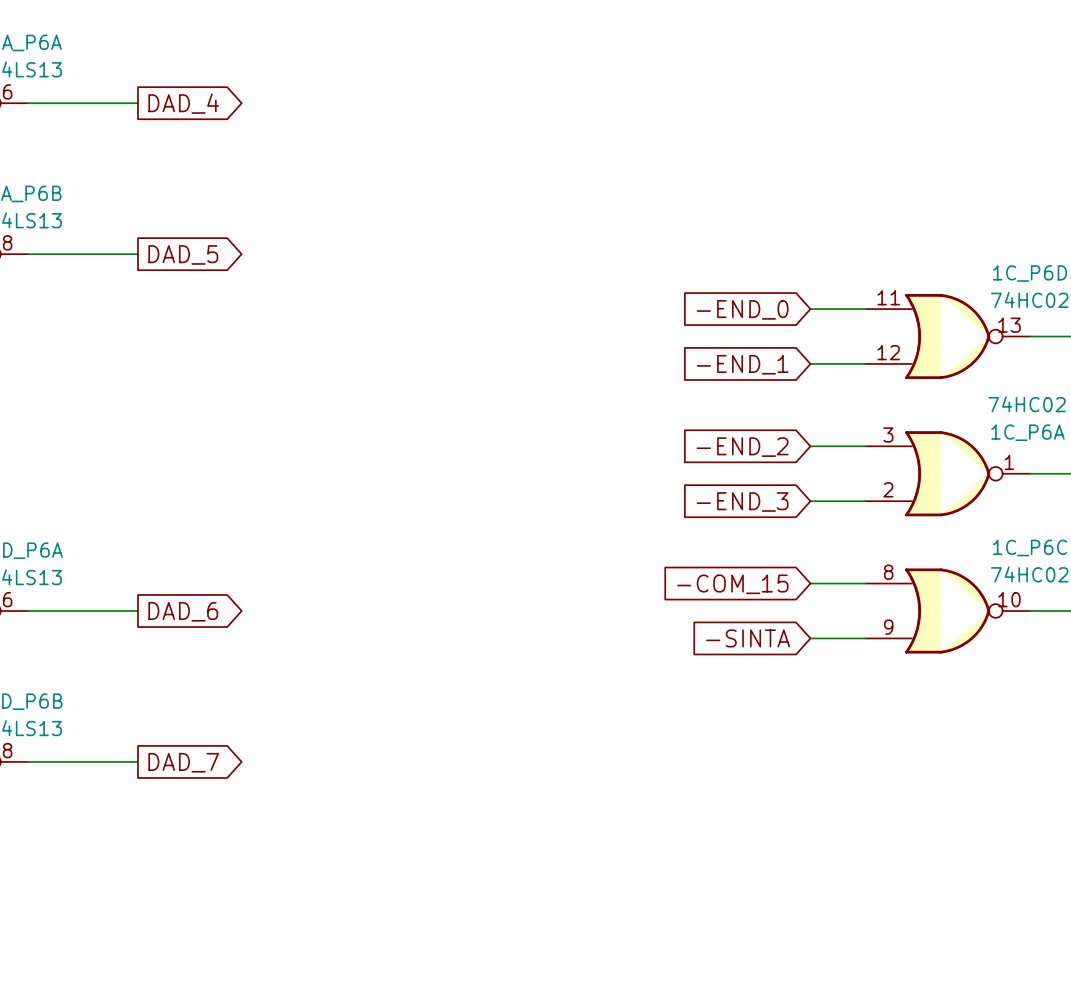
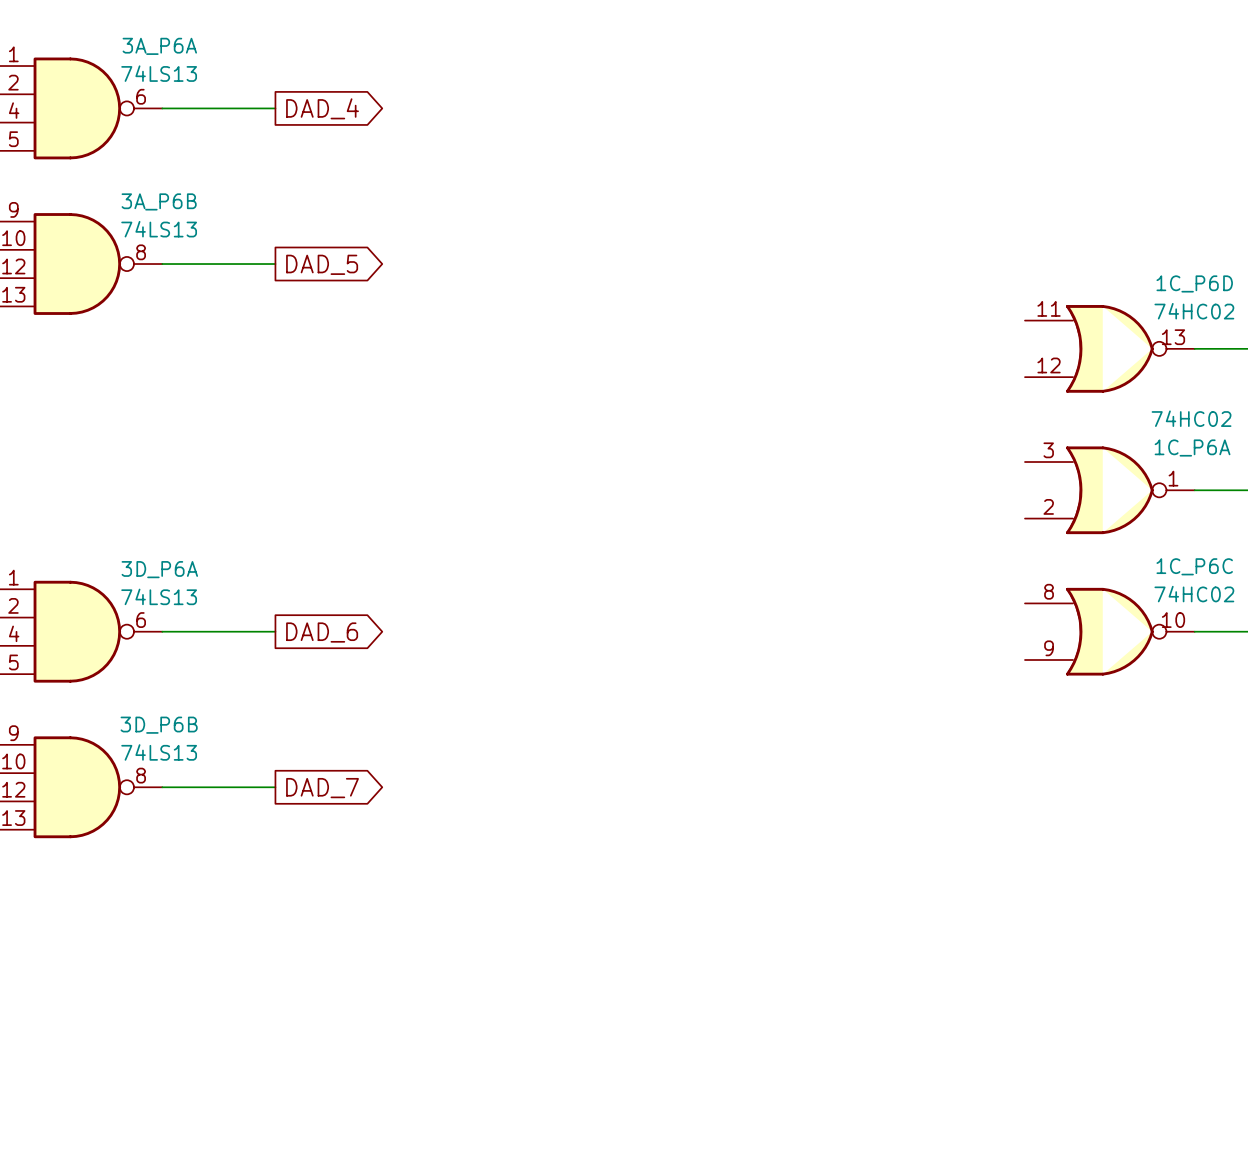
global label: -END_0 (742, 309) -> none
wire: (810, 309) (865, 309) -> none
wire: (810, 363) (865, 363) -> none
global label: -END_1 (742, 364) -> none
wire: (810, 446) (865, 446) -> none
global label: -END_2 (742, 447) -> none
global label: -END_3 (742, 501) -> none
wire: (810, 501) (865, 501) -> none
wire: (810, 583) (865, 583) -> none
global label: -COM_15 (732, 584) -> none
global label: -SINTA (748, 638) -> none
wire: (810, 638) (865, 638) -> none

